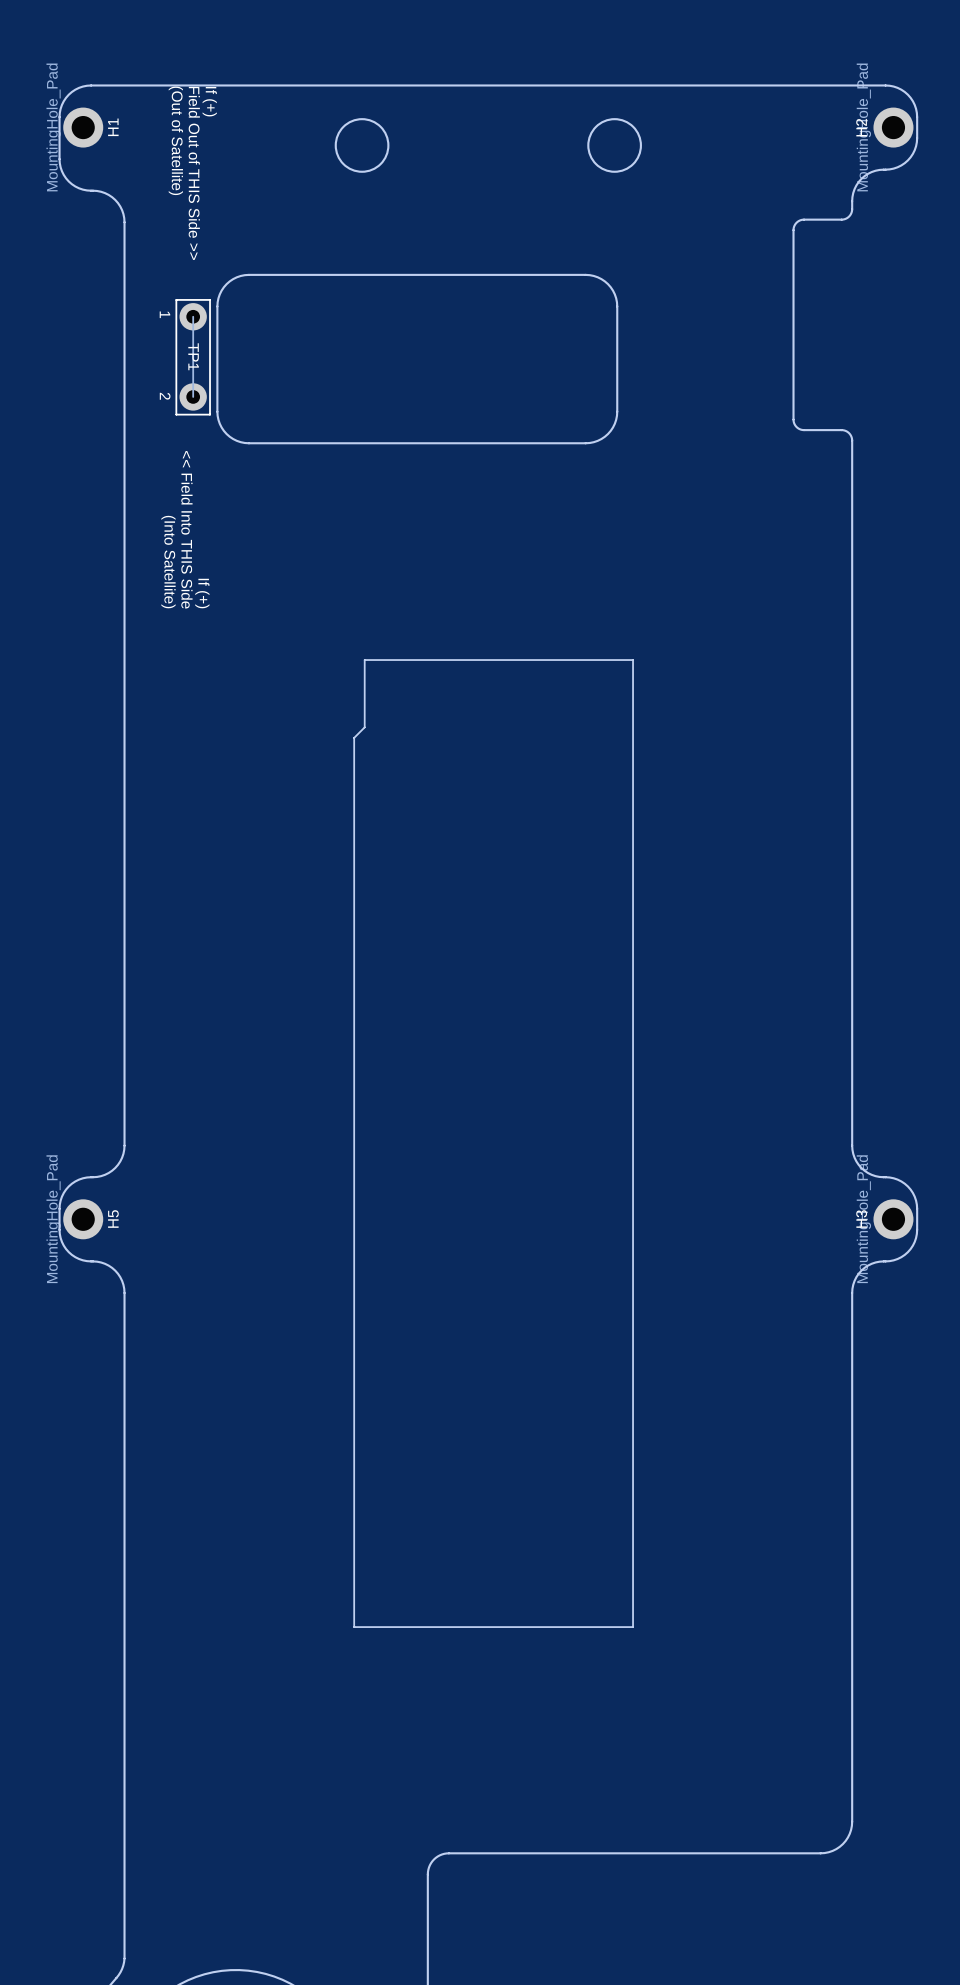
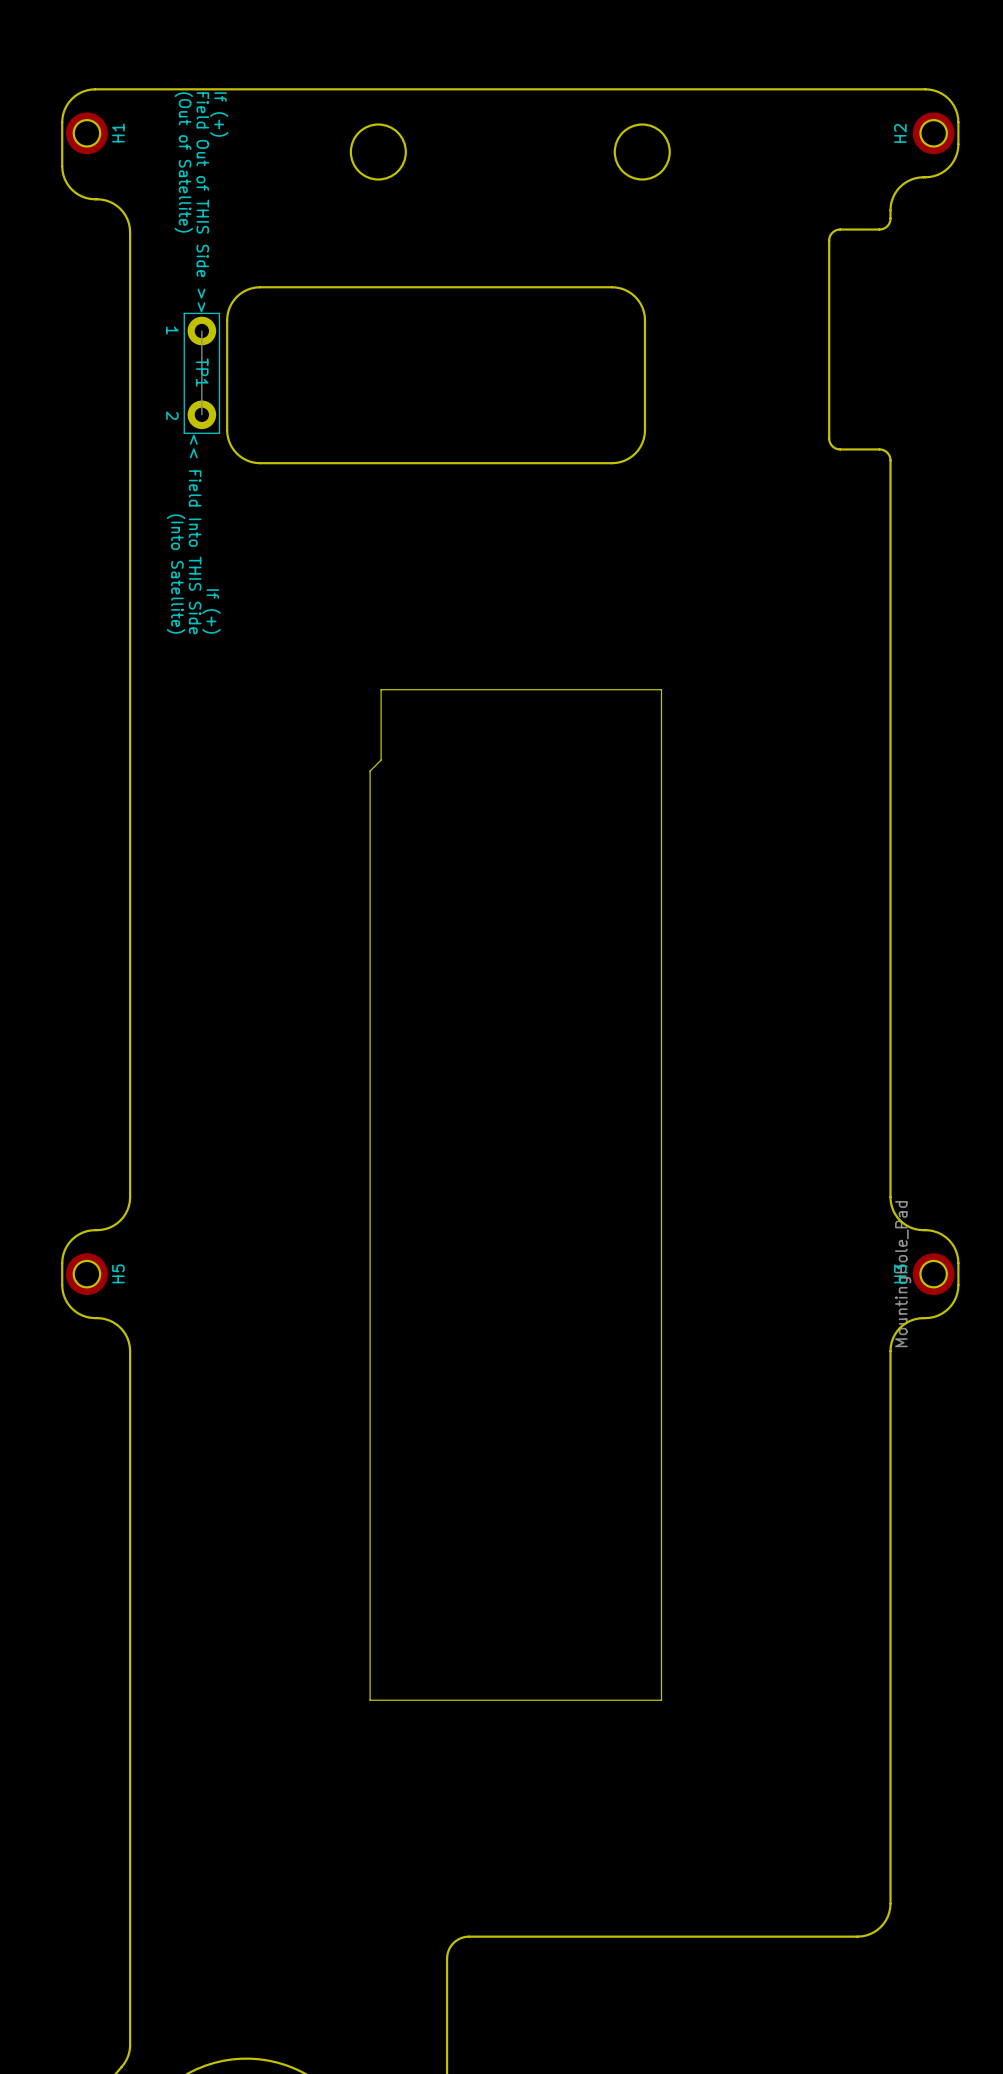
H1 value: MountingHole_Pad (53, 127) -> none
H2 value: MountingHole_Pad (863, 127) -> none
H5 value: MountingHole_Pad (53, 1219) -> none

